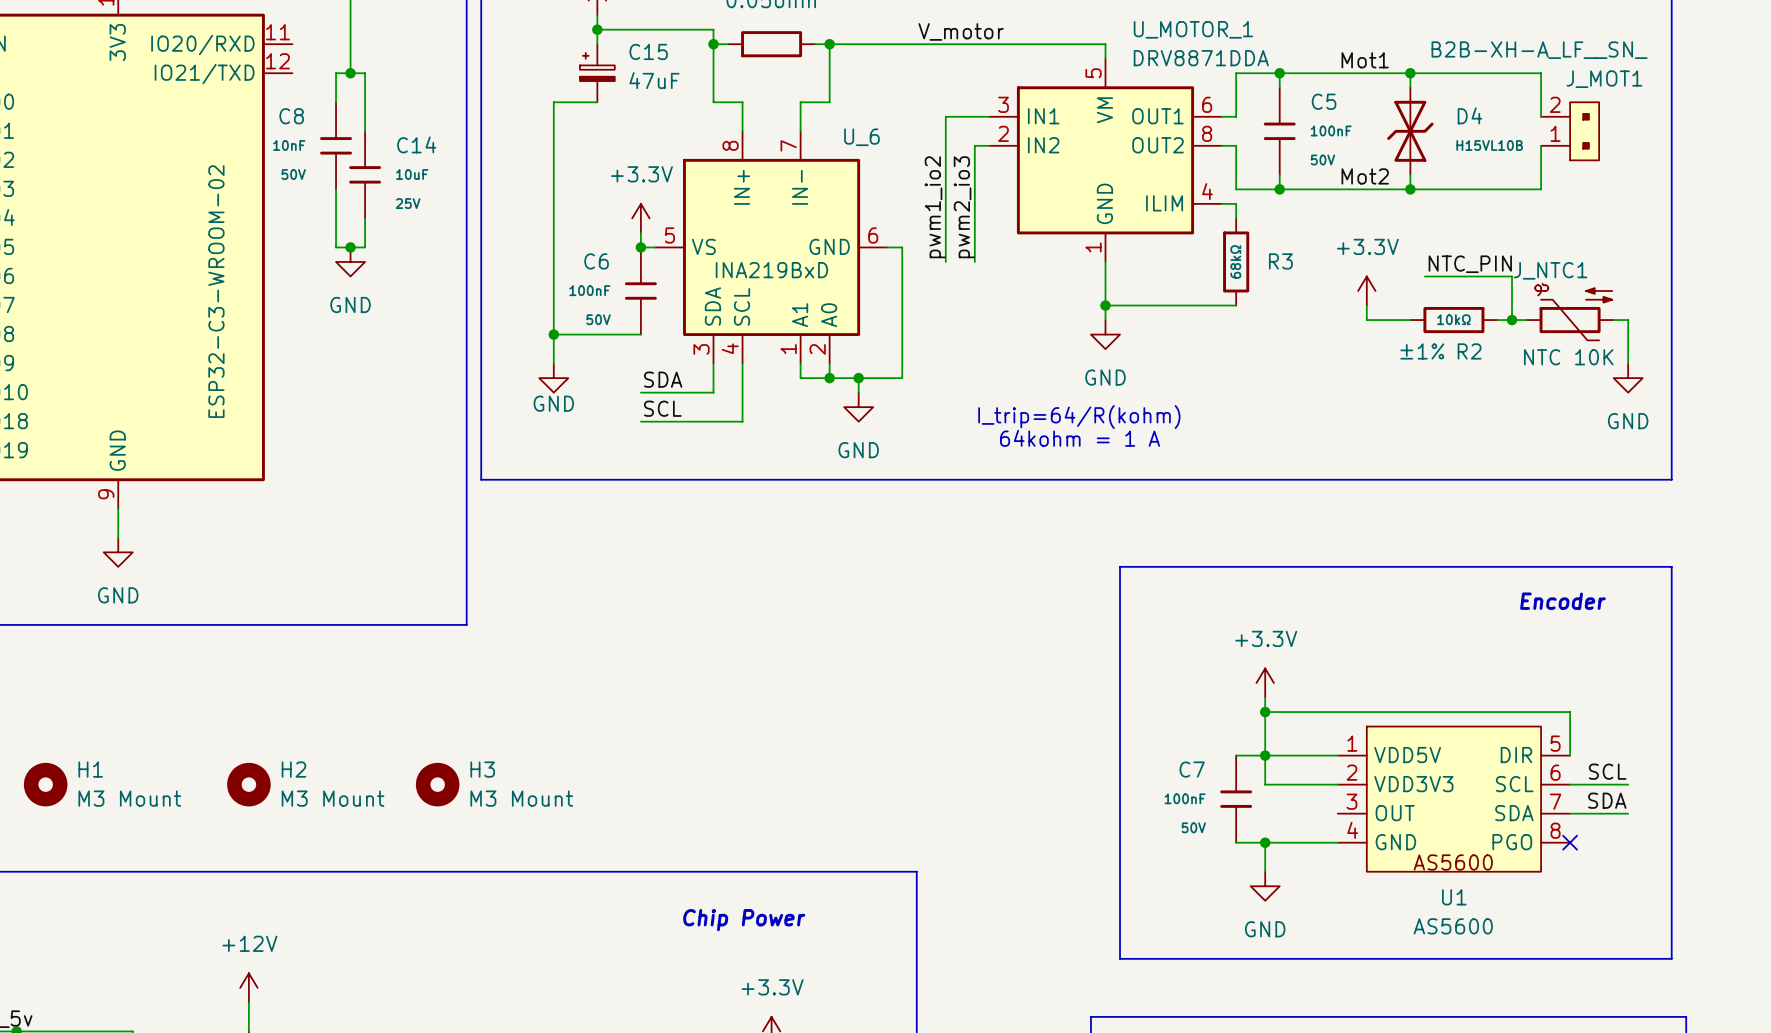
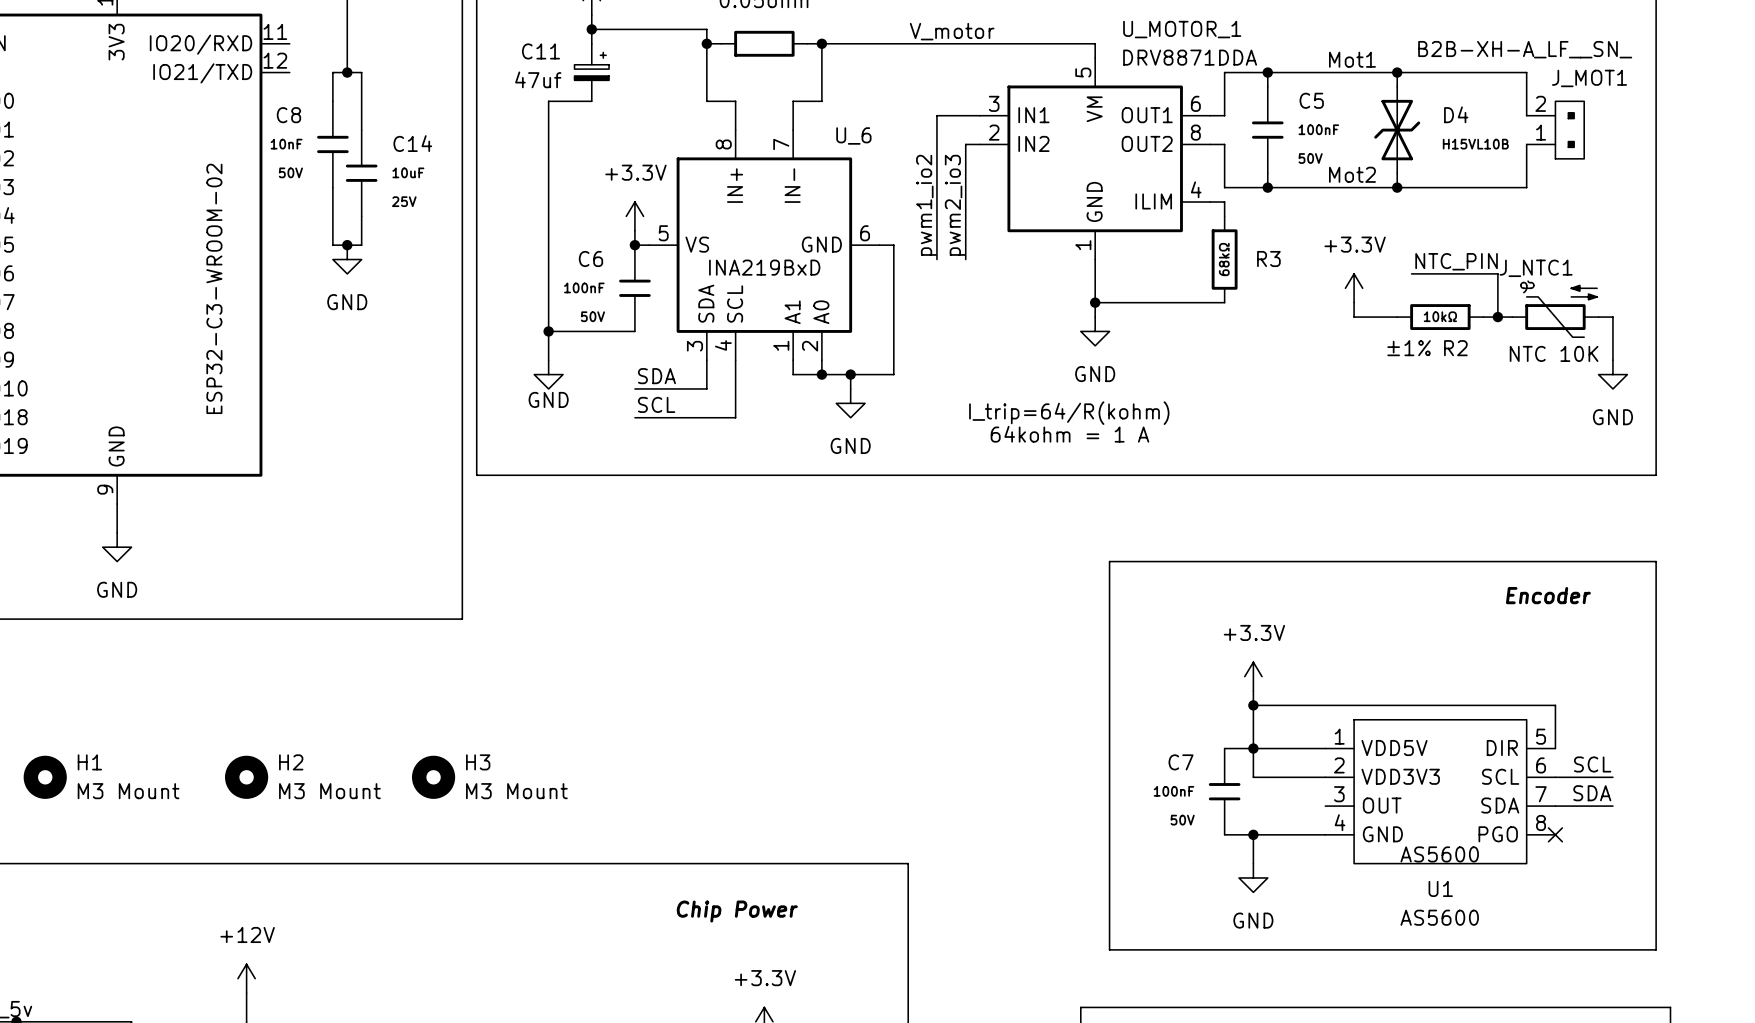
C15: 47uF (597, 73) -> none
C11: none -> 47uf (591, 72)

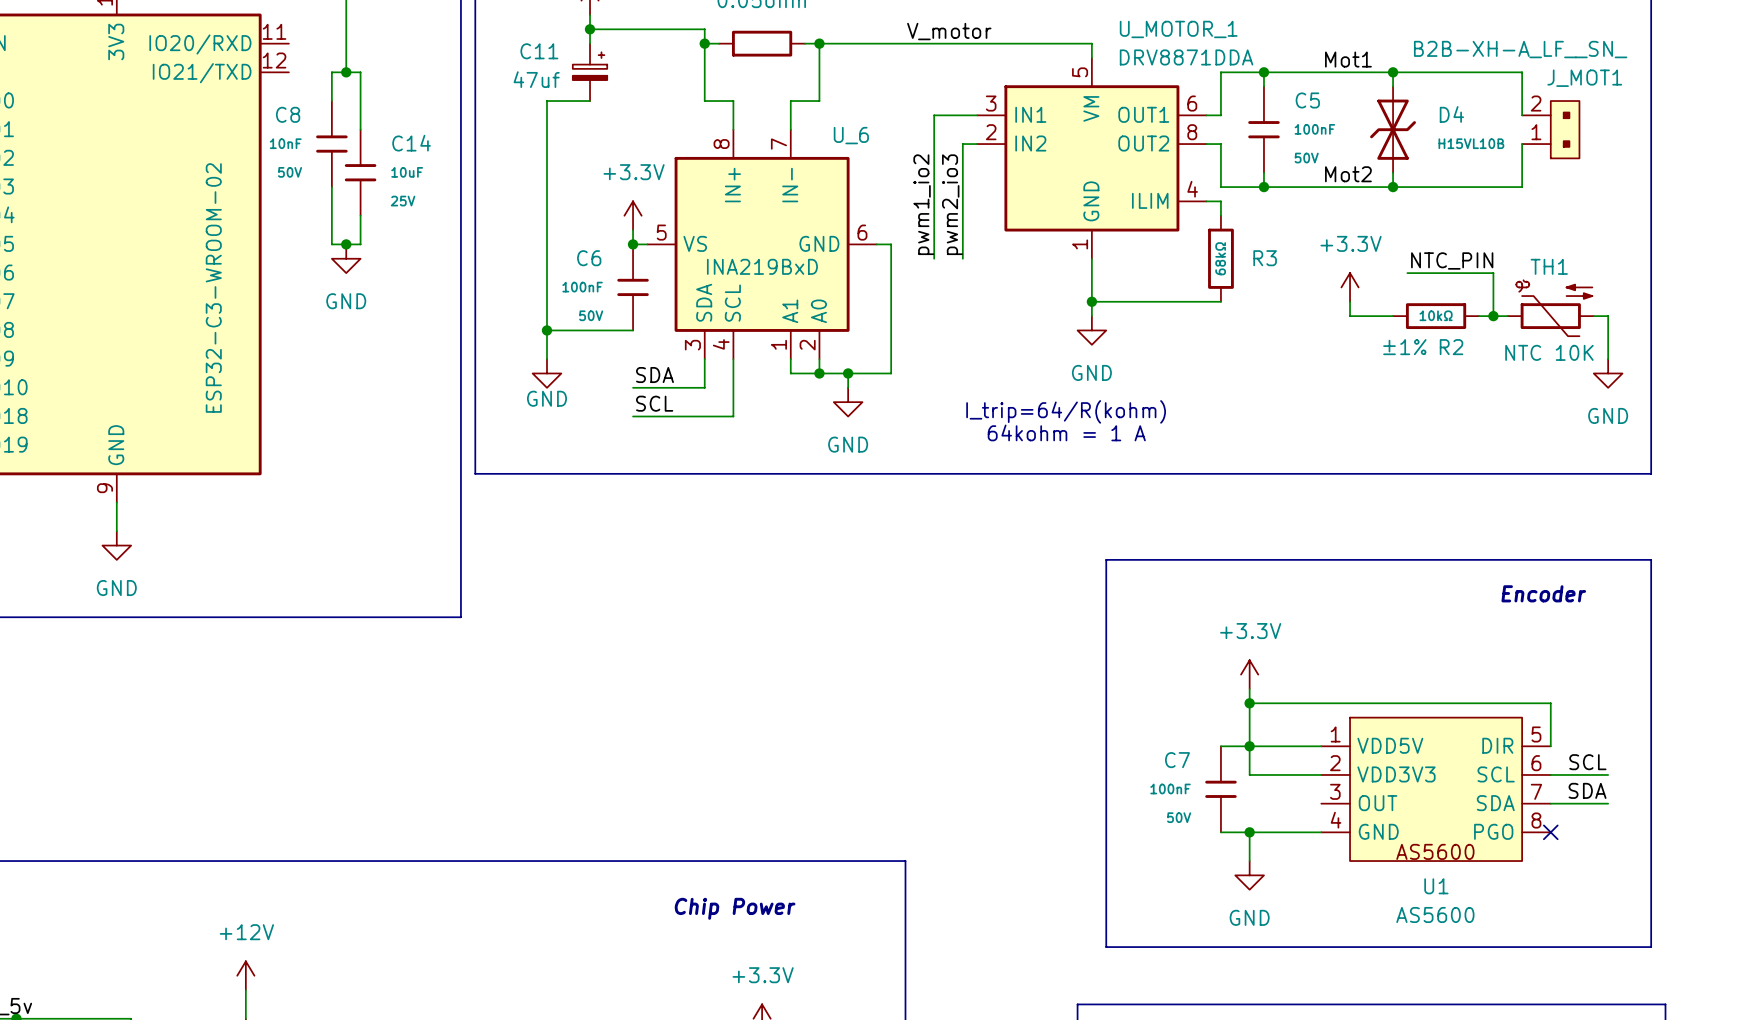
J_NTC1 name: J_NTC1 (1536, 268) -> TH1 (1549, 266)
H1: M3 Mount (45, 777) -> none
H2: M3 Mount (246, 777) -> none
H3: M3 Mount (433, 777) -> none

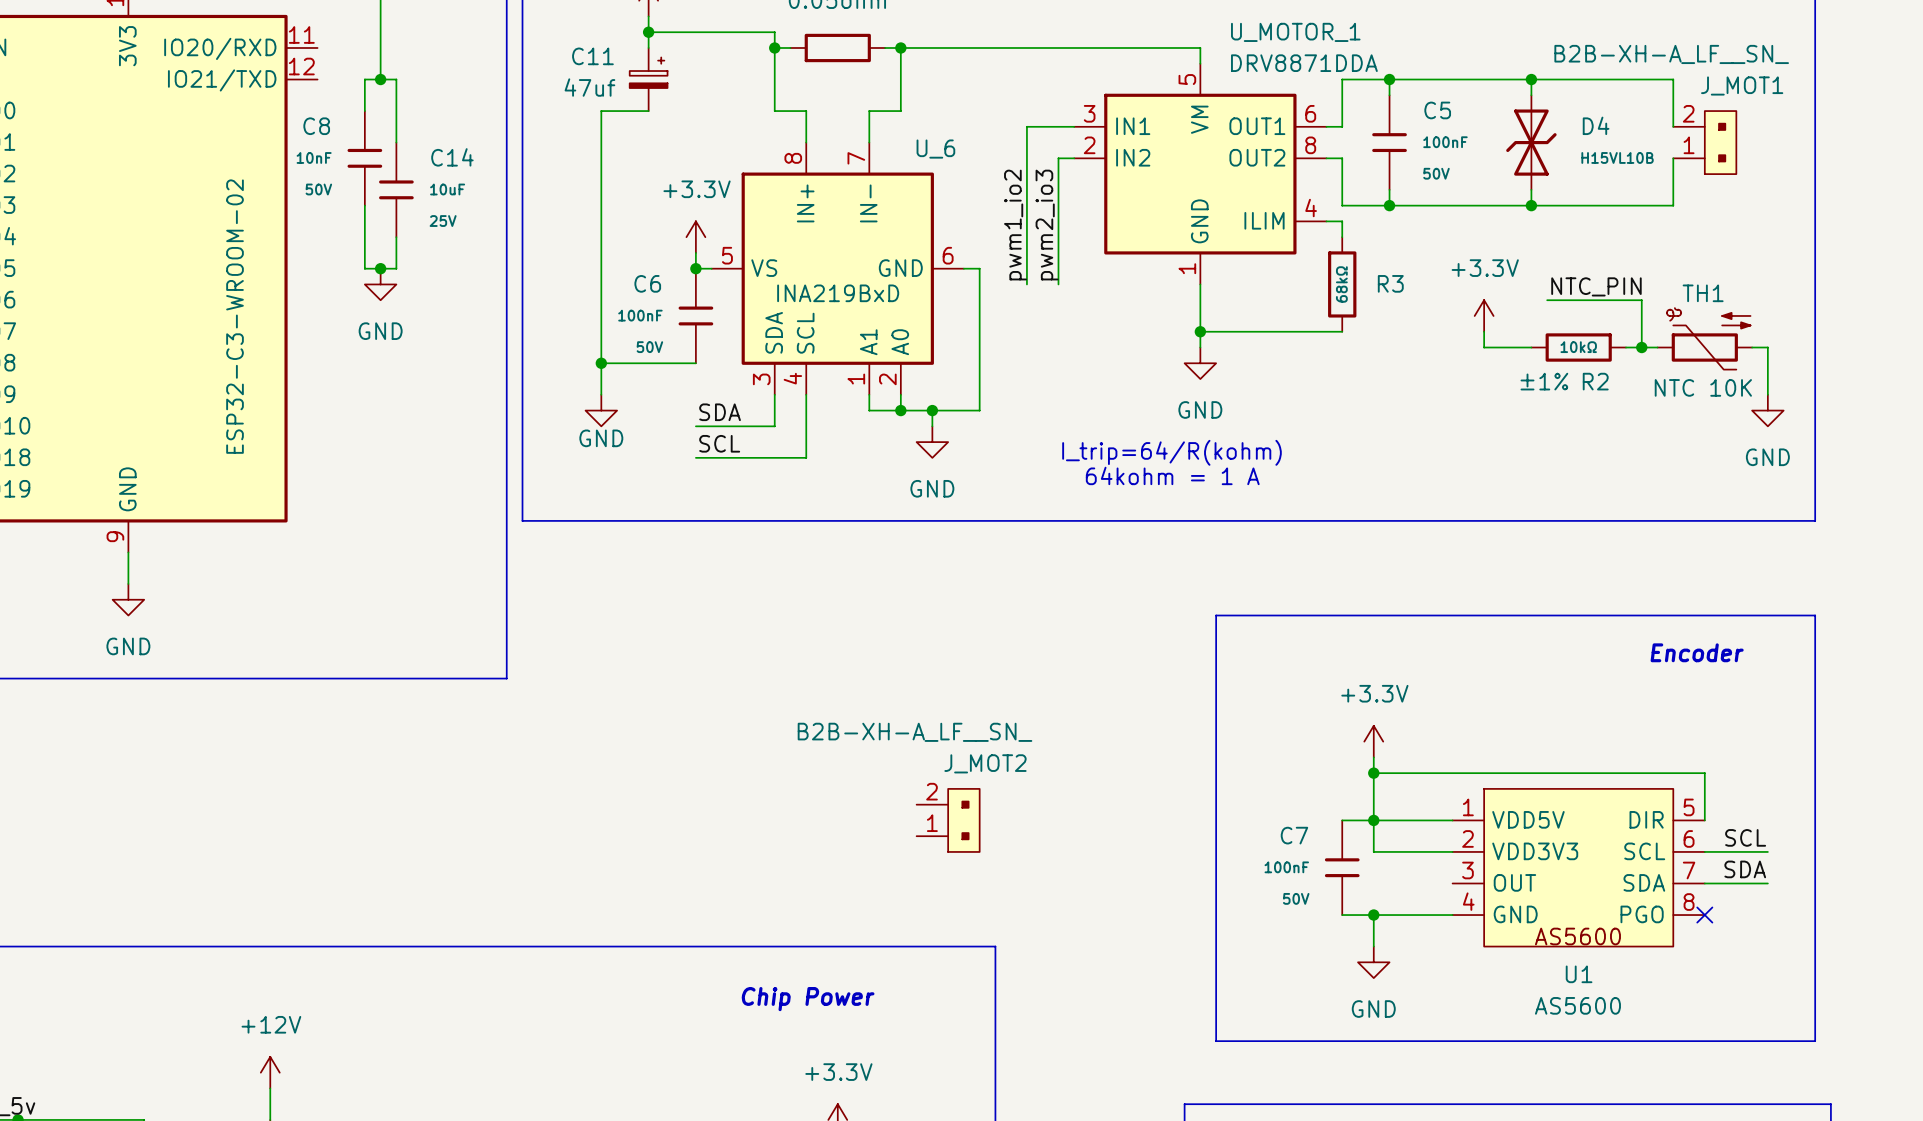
label: V_motor (949, 31) -> none
label: Mot1 (1348, 59) -> none
label: Mot2 (1348, 174) -> none
J_MOT2: none -> B2B-XH-A_LF__SN_ (948, 820)

